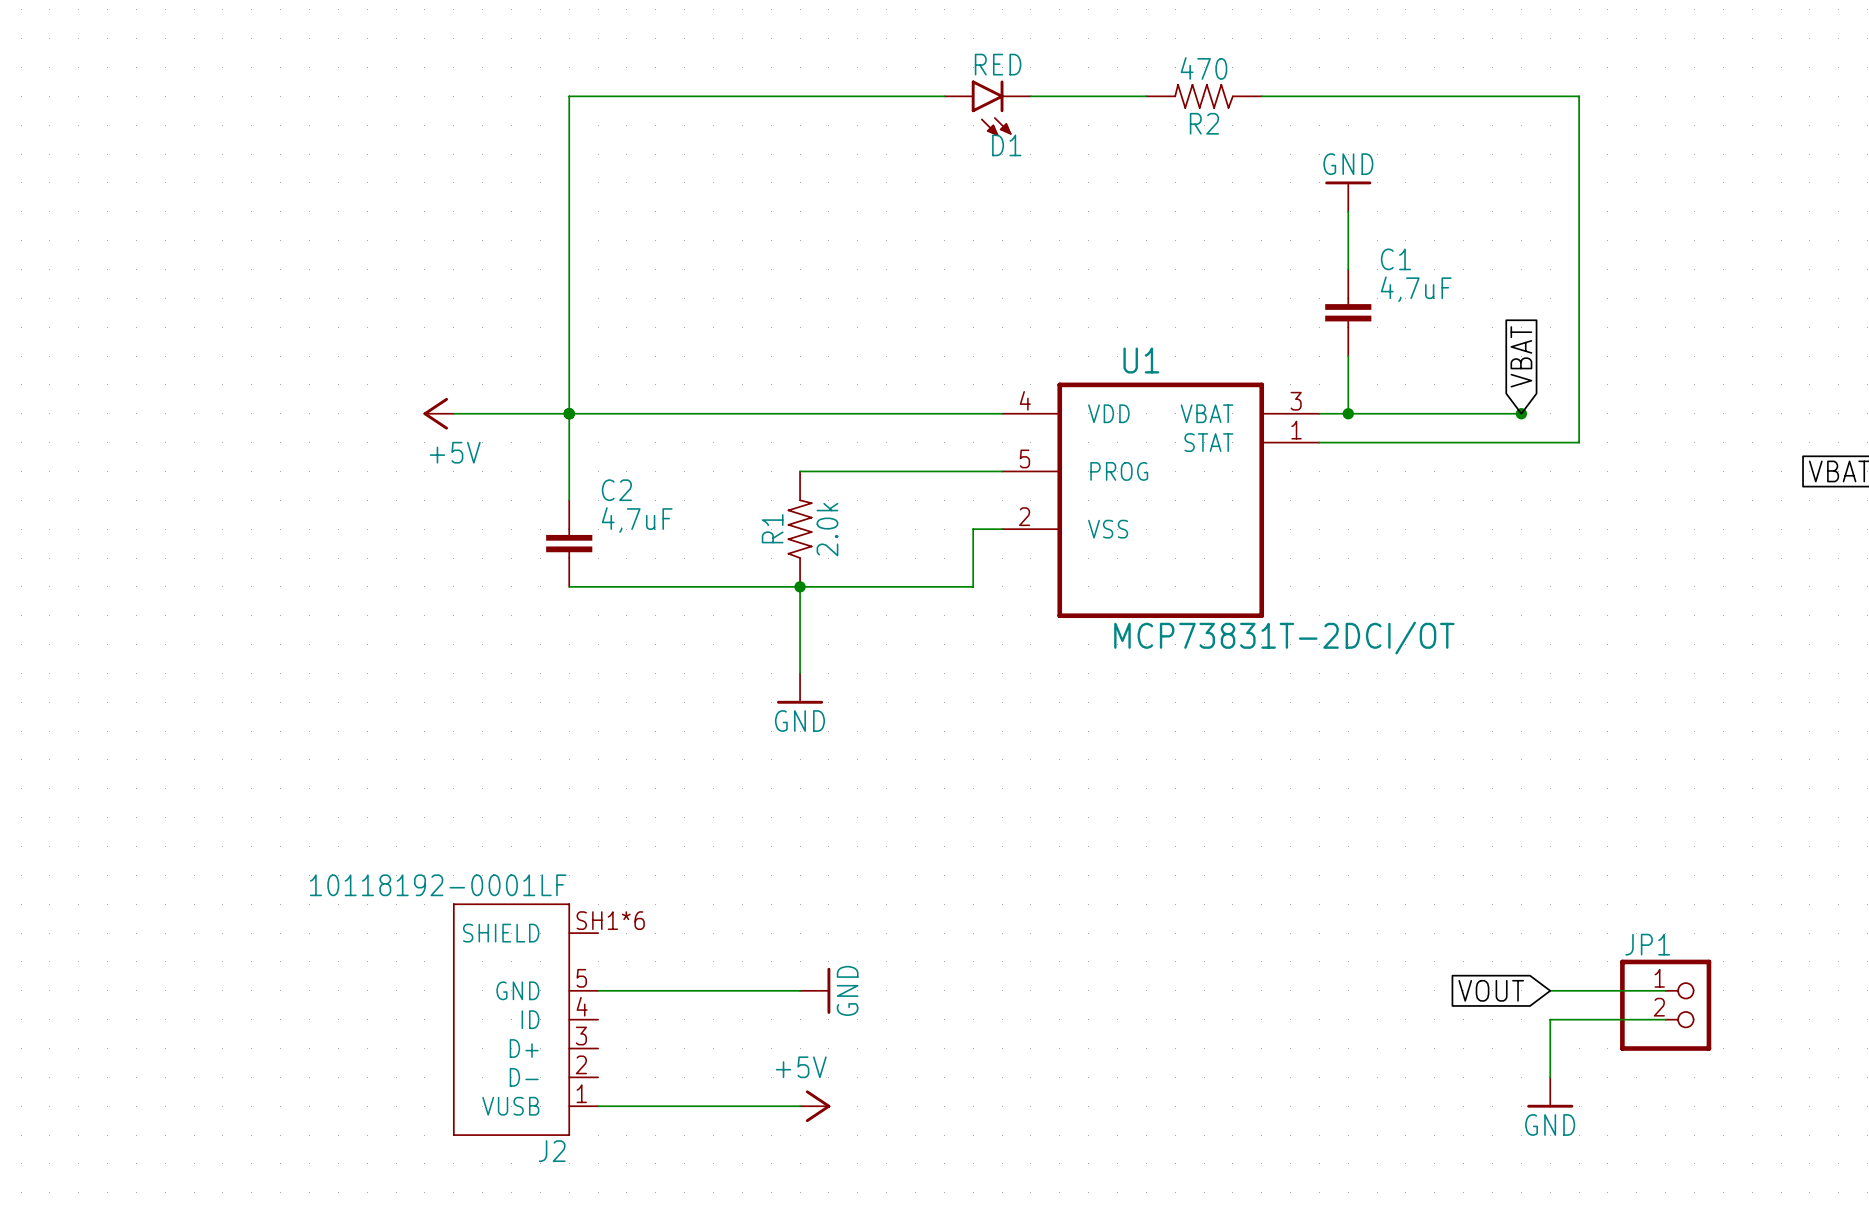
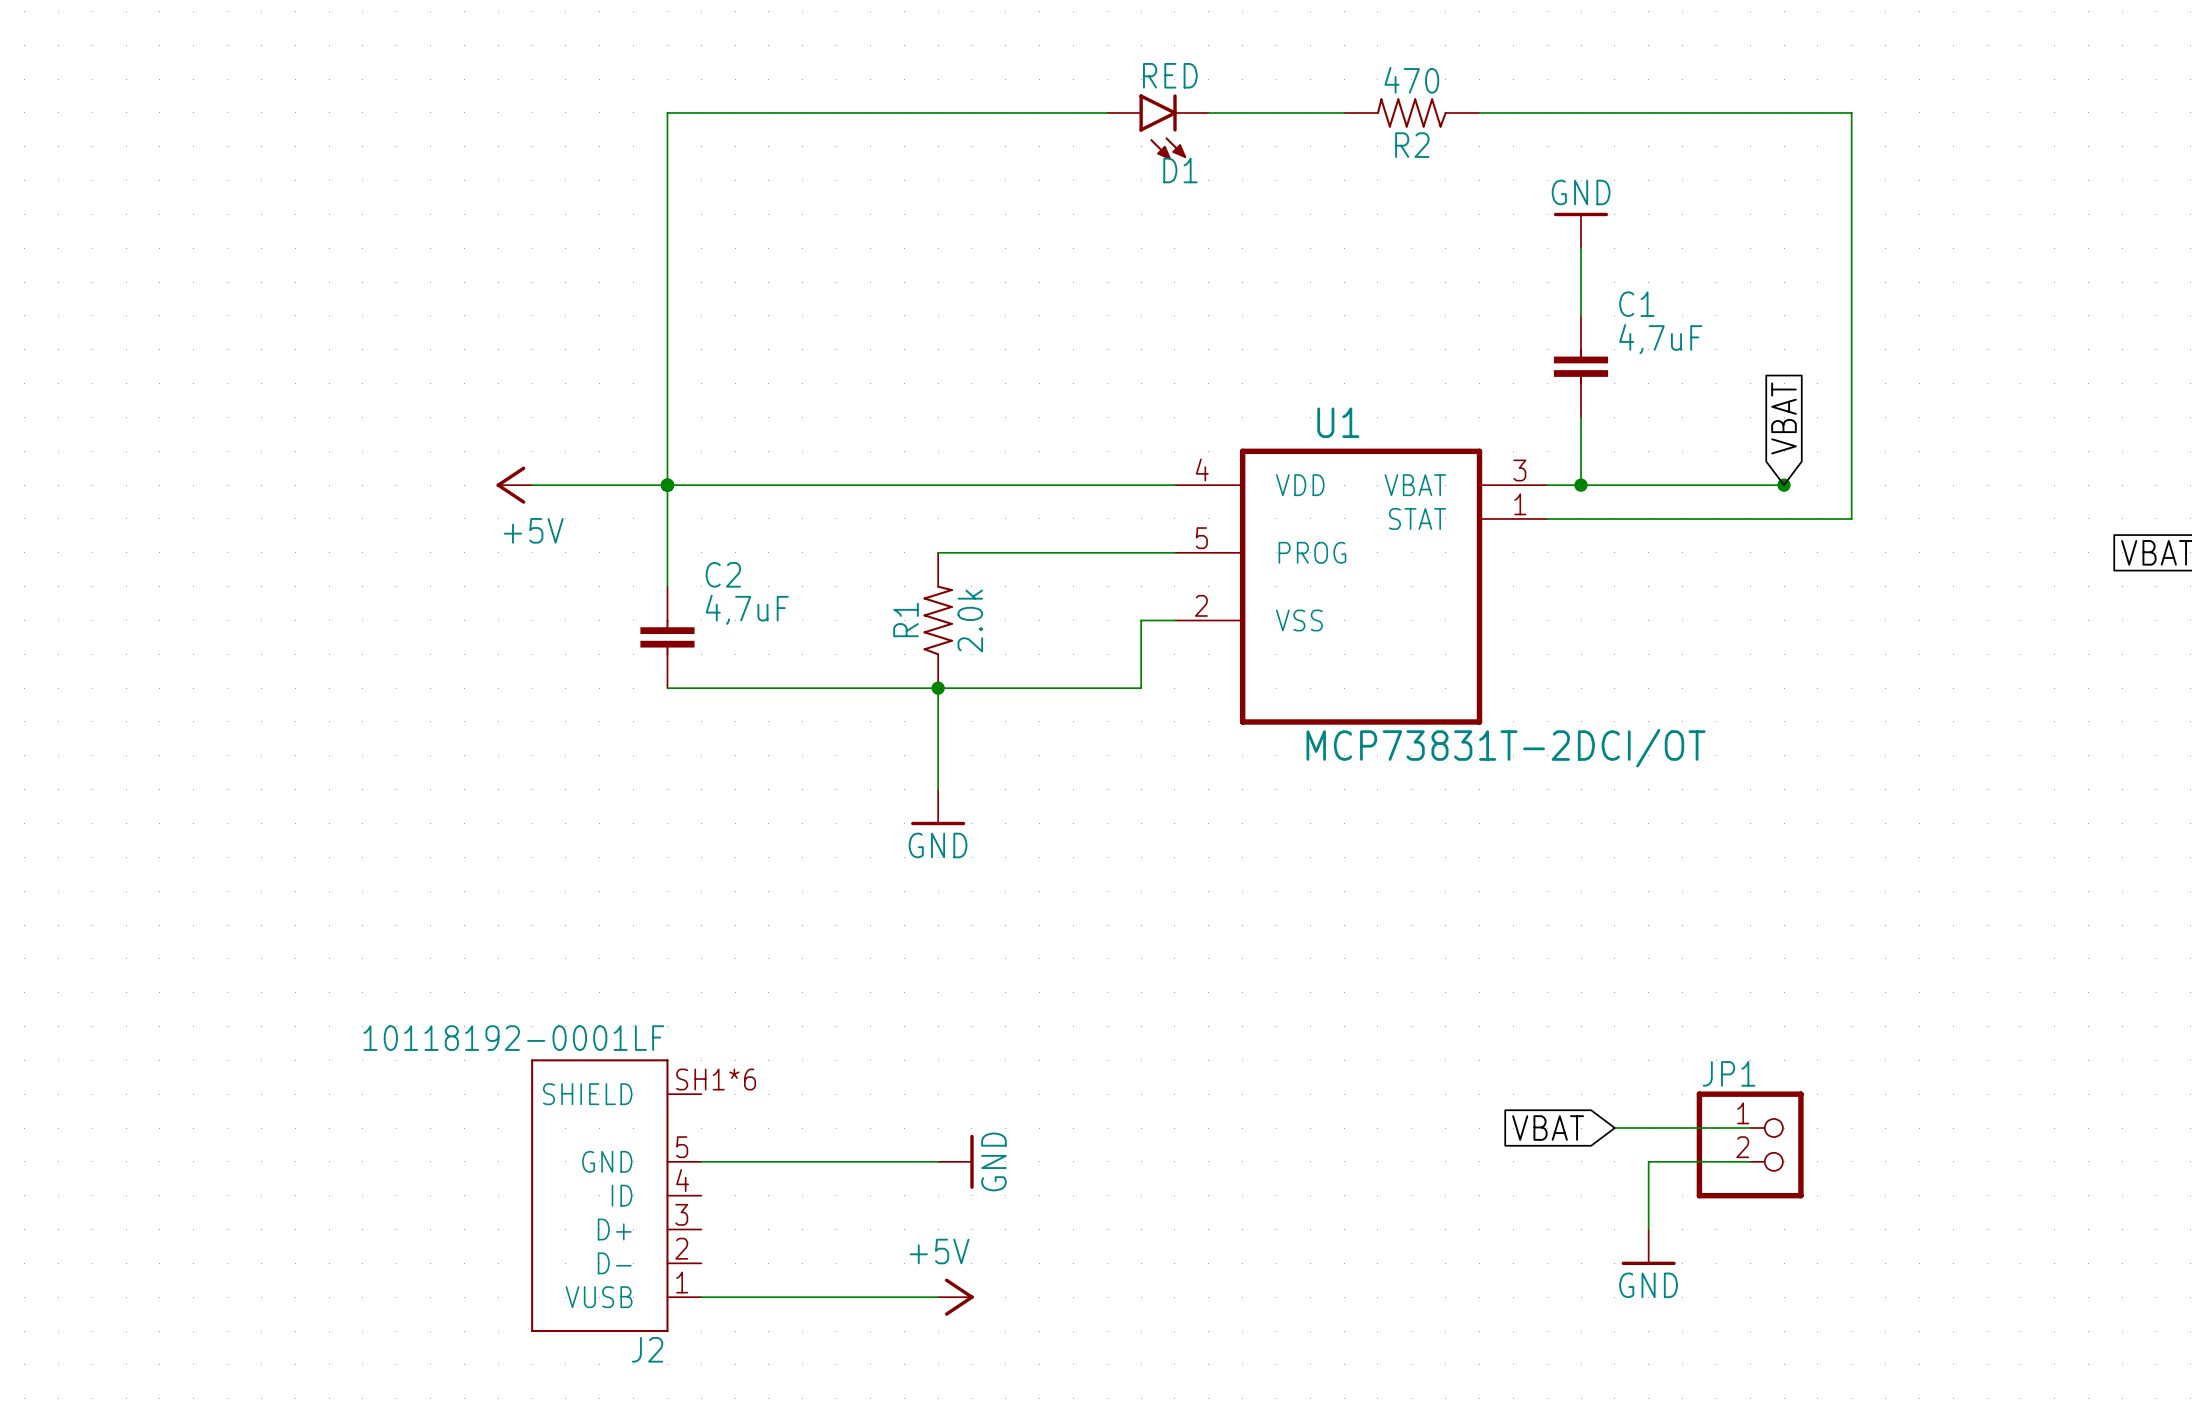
global label: none -> VBAT (1548, 1128)
global label: VOUT (1491, 990) -> none
wire: none -> (1750, 1161) (1648, 1161) (1648, 1229)
wire: (1550, 990) (1665, 990) -> (1614, 1128) (1750, 1128)
JP1 position: (1665, 1005) -> (1750, 1144)
wire: (1665, 1019) (1550, 1019) (1550, 1077) -> none
power symbol position: GND (1550, 1092) -> GND (1648, 1247)

